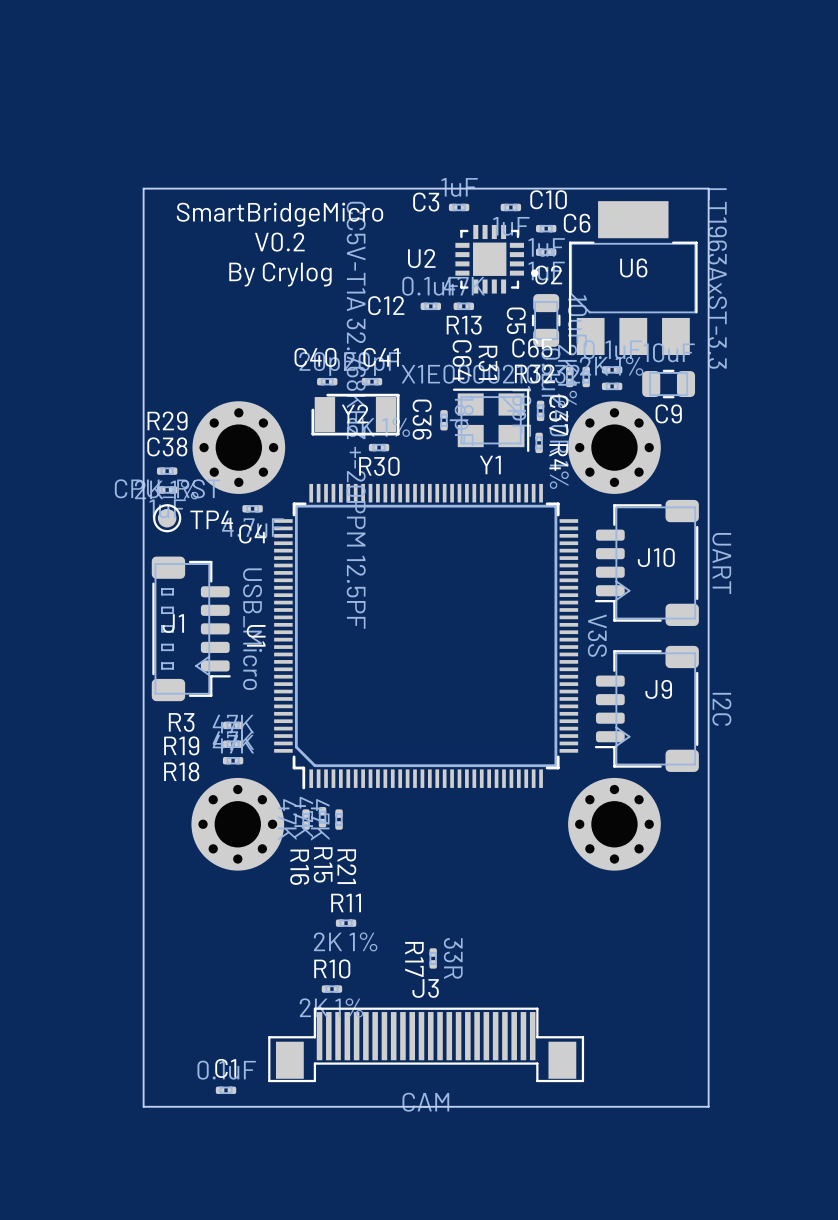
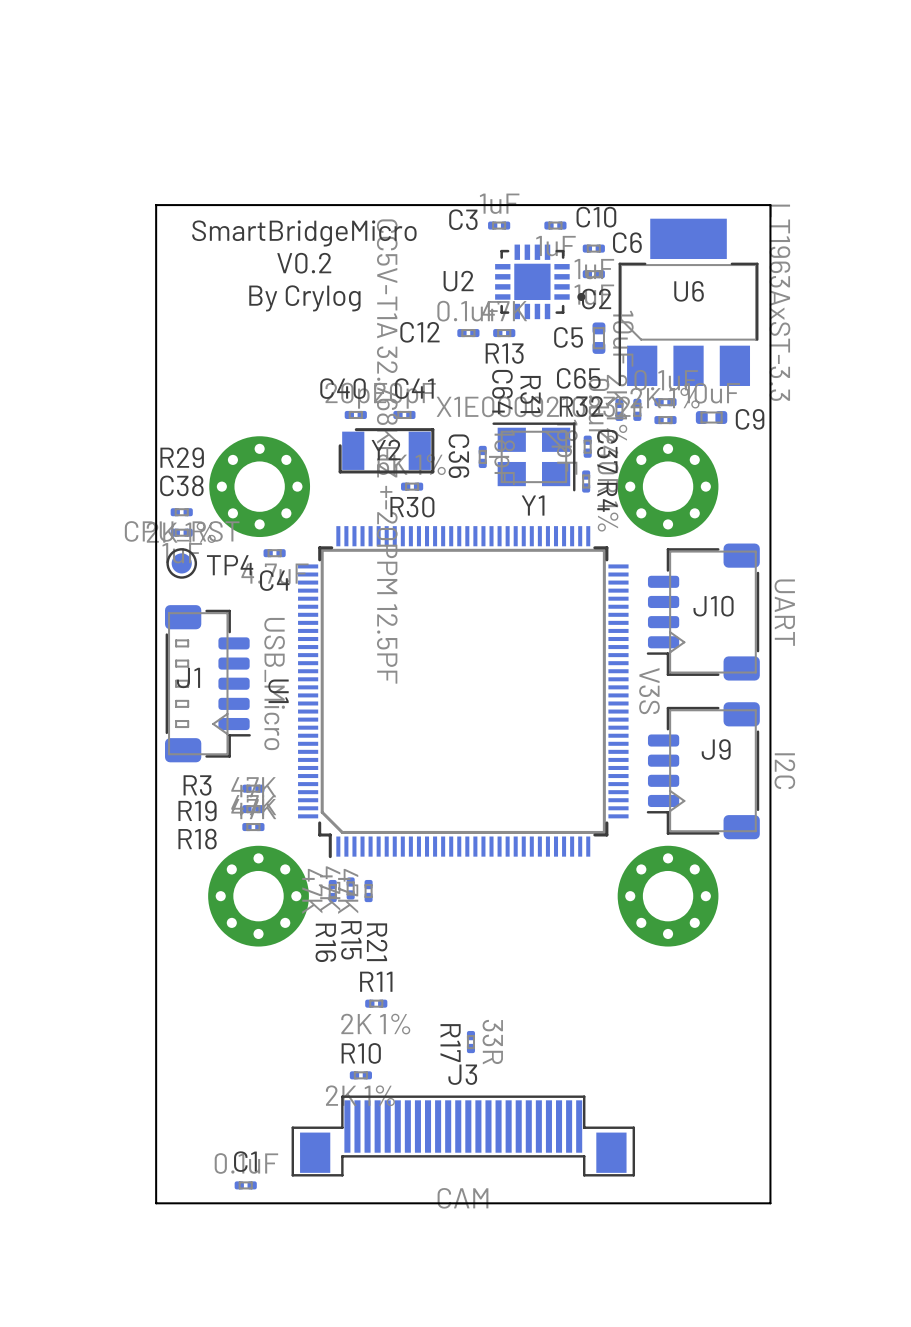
C5 footprint: [531, 294, 561, 347] -> [592, 322, 606, 354]
C9 footprint: [642, 369, 696, 399] -> [695, 411, 728, 424]
C9 name position: C9 (668, 413) -> C9 (750, 419)

